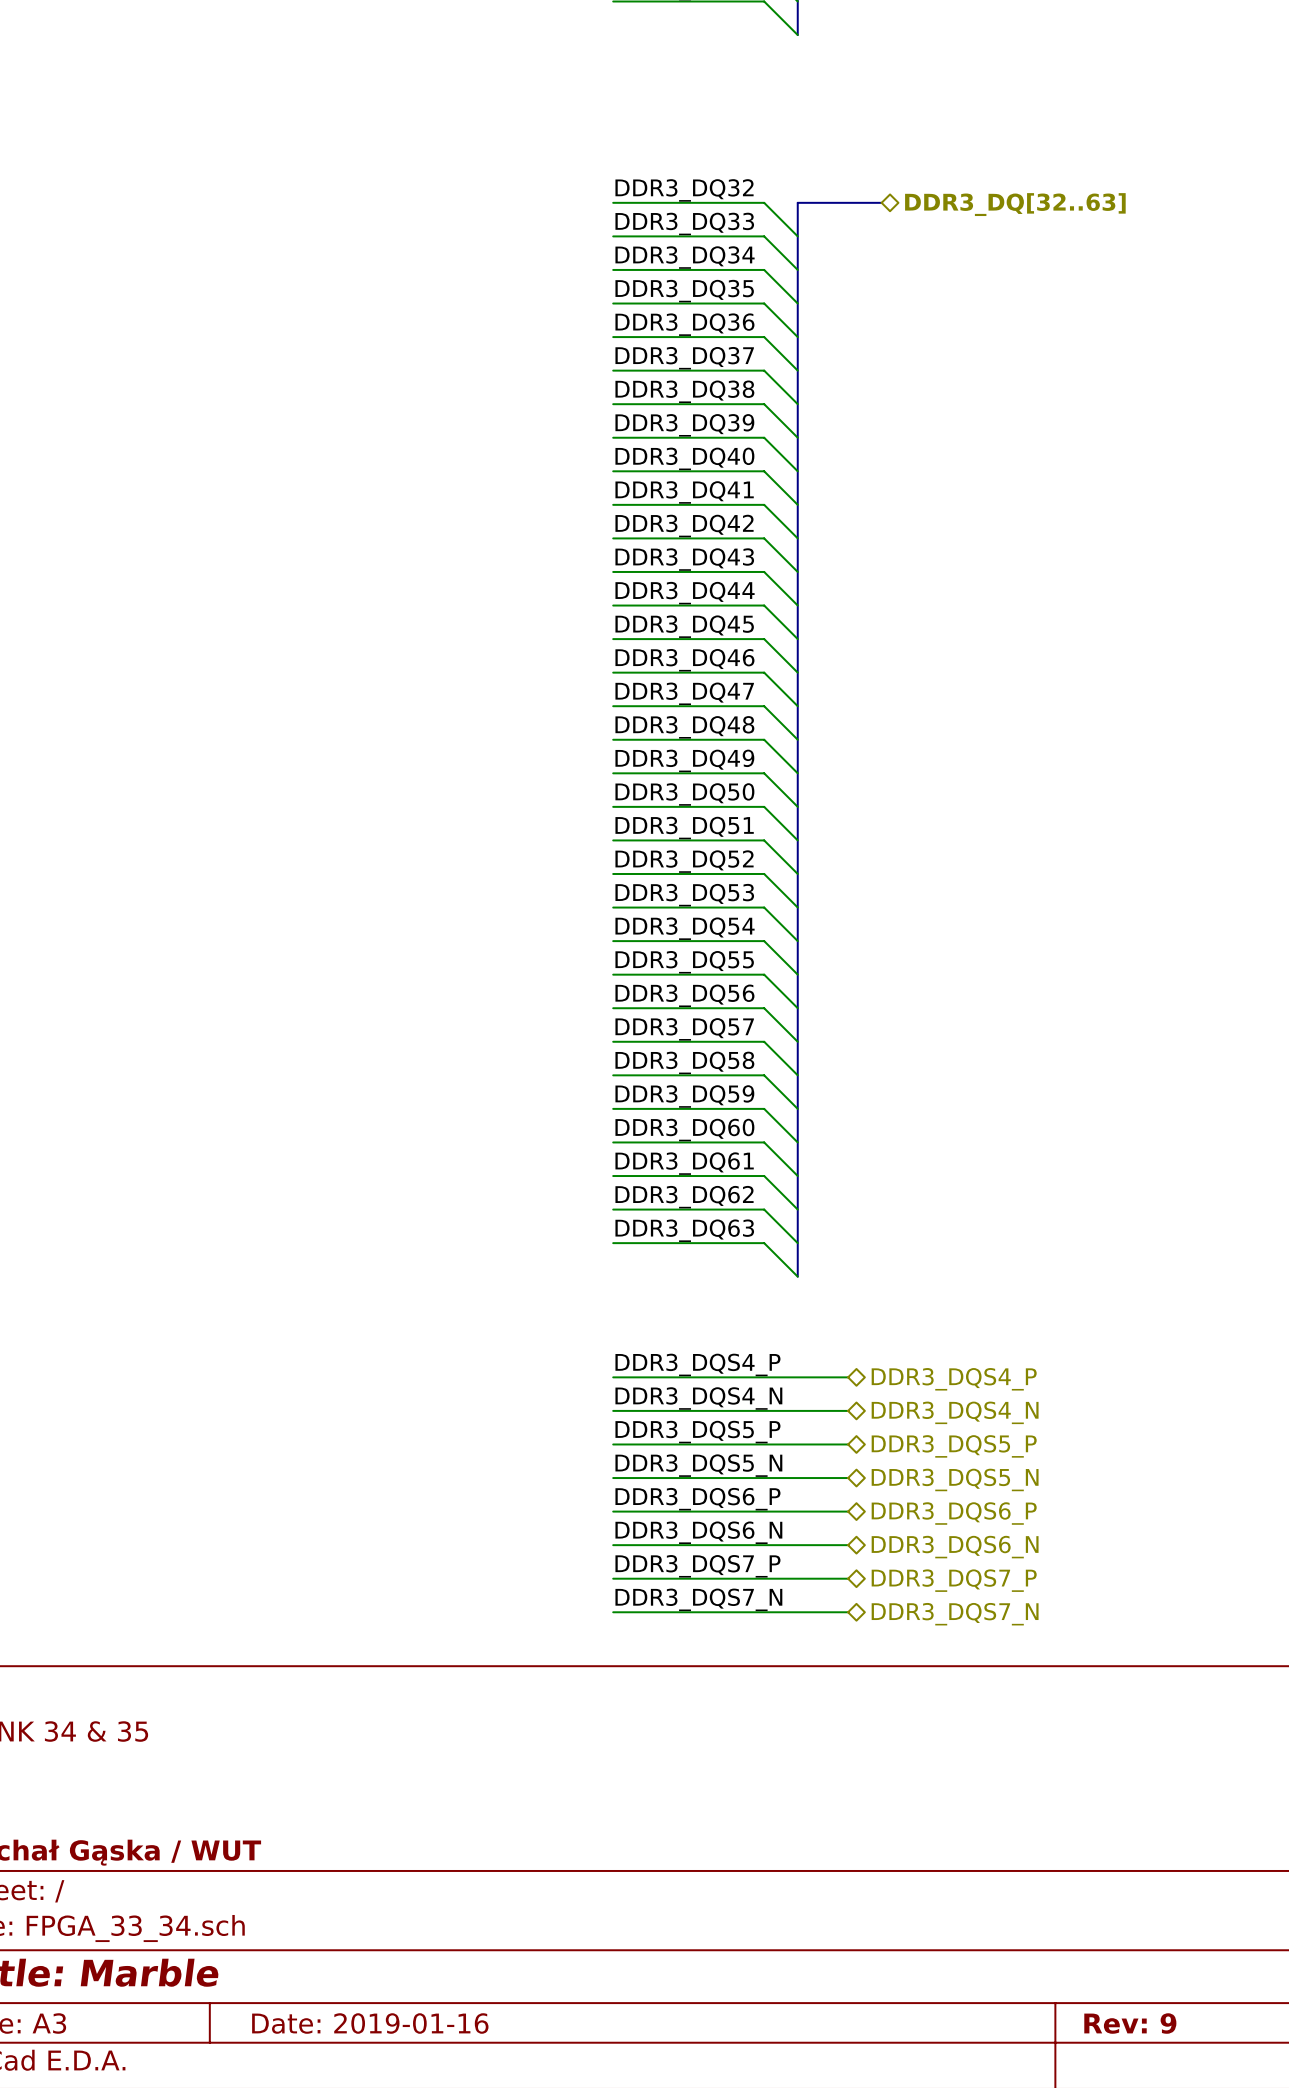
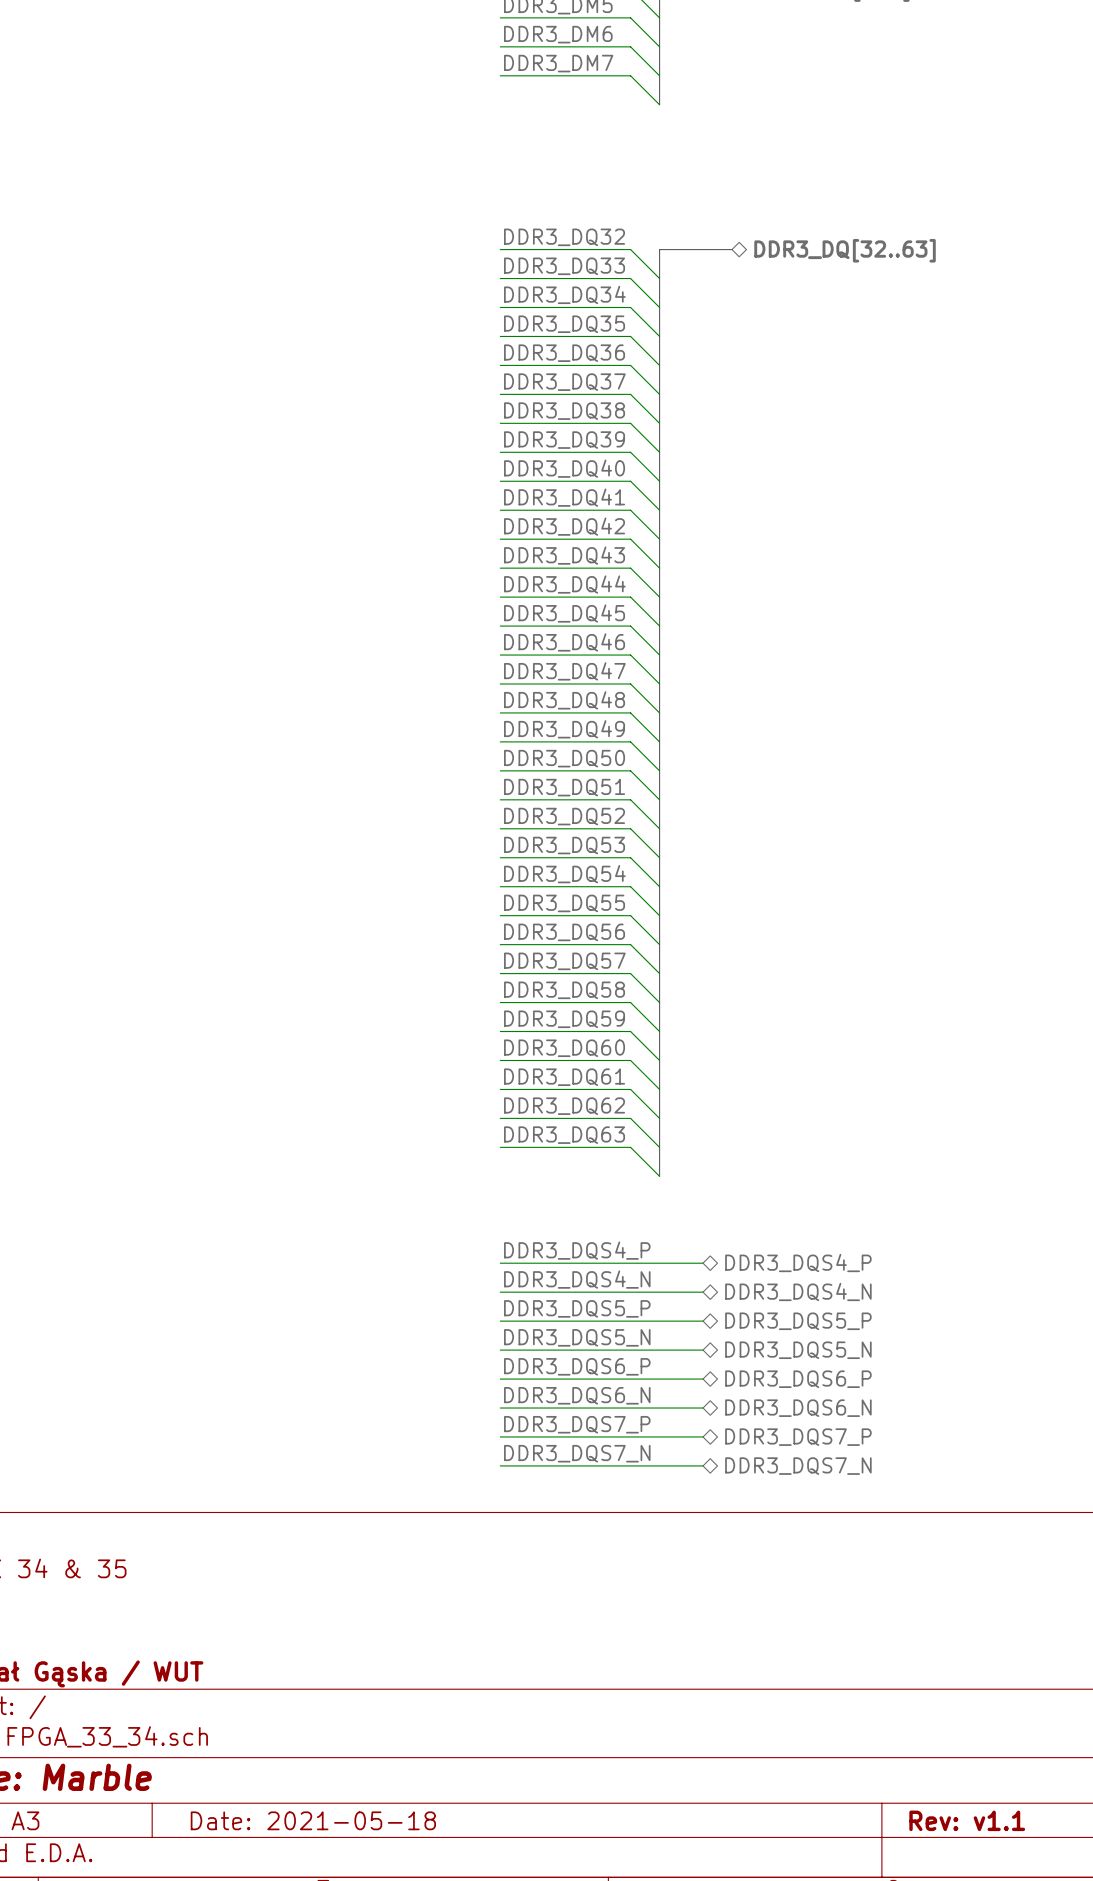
title block: Date: 2019-01-16 (370, 2023) -> Date: 2021-05-18 (313, 1820)
title block: Rev: 9 (1130, 2023) -> Rev: v1.1 (967, 1820)

